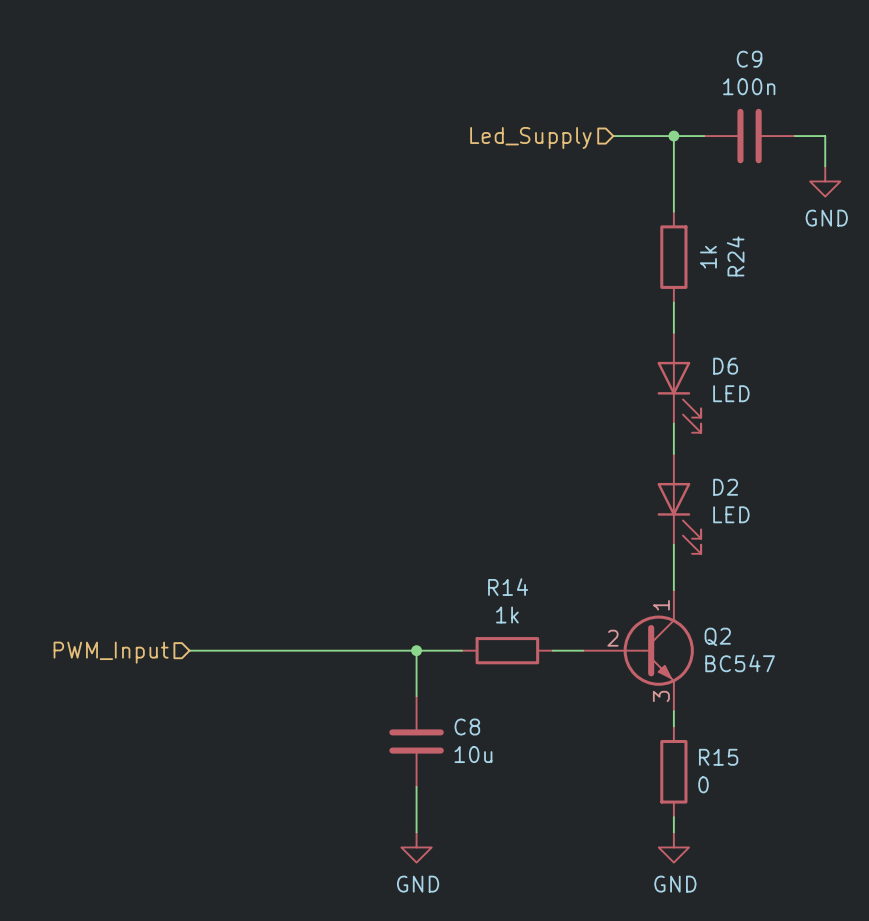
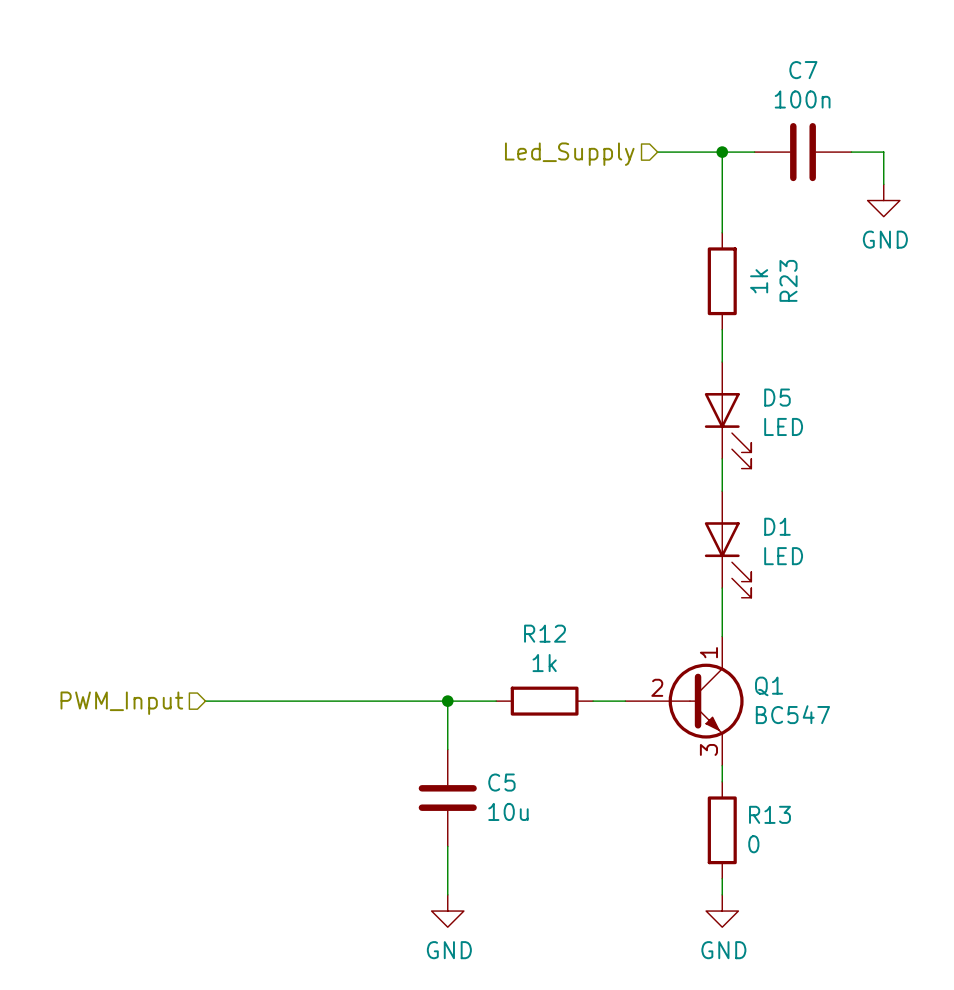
C9 name: C9 (749, 59) -> C7 (803, 70)
R24 name: R24 (735, 256) -> R23 (788, 280)
D6 name: D6 (725, 366) -> D5 (777, 397)
D2 name: D2 (725, 487) -> D1 (777, 526)
R14 name: R14 (508, 587) -> R12 (545, 633)
Q2 name: Q2 (717, 636) -> Q1 (769, 686)
C8 name: C8 (467, 727) -> C5 (501, 782)
R15 name: R15 (718, 757) -> R13 (769, 814)

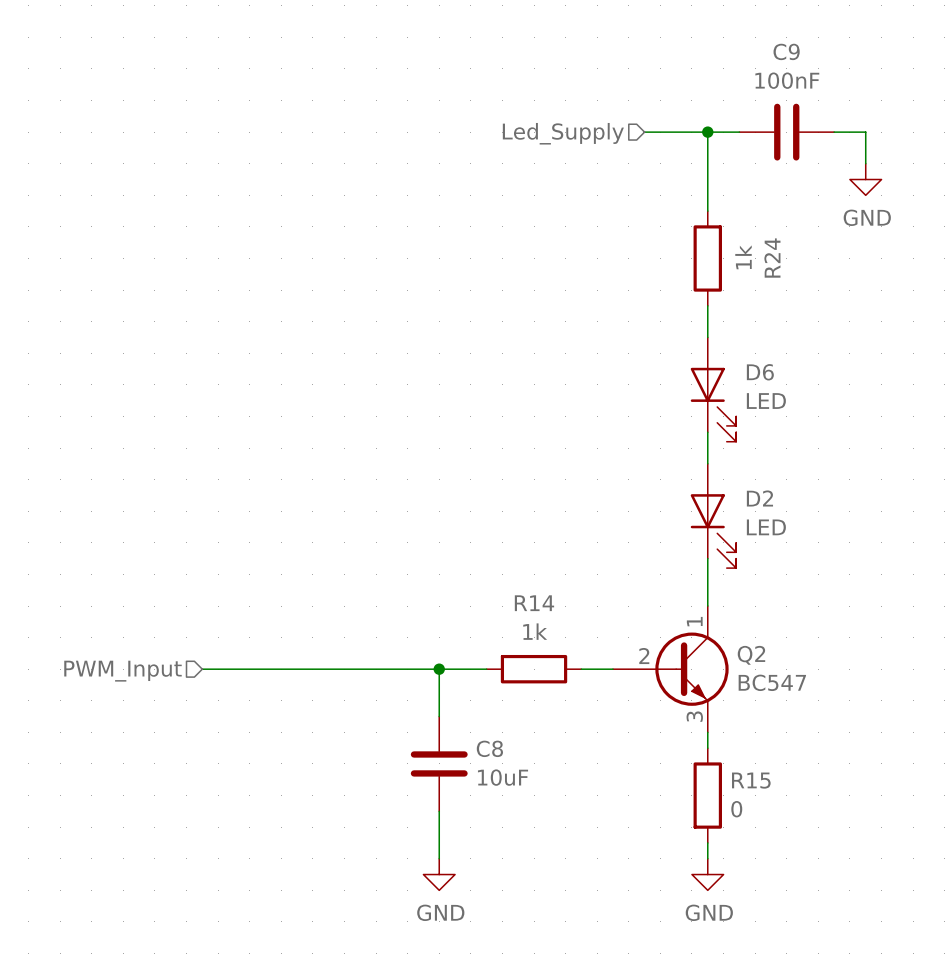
C7 name: C7 (803, 70) -> C9 (786, 51)
C7 value: 100n (802, 99) -> 100nF (787, 80)
R23 name: R23 (788, 280) -> R24 (772, 258)
D5 name: D5 (777, 397) -> D6 (760, 372)
D1 name: D1 (777, 526) -> D2 (759, 498)
R12 name: R12 (545, 633) -> R14 (534, 603)
Q1 name: Q1 (769, 686) -> Q2 (751, 655)
C5 name: C5 (501, 782) -> C8 (489, 748)
C5 value: 10u (508, 811) -> 10uF (503, 777)
R13 name: R13 (769, 814) -> R15 (751, 780)

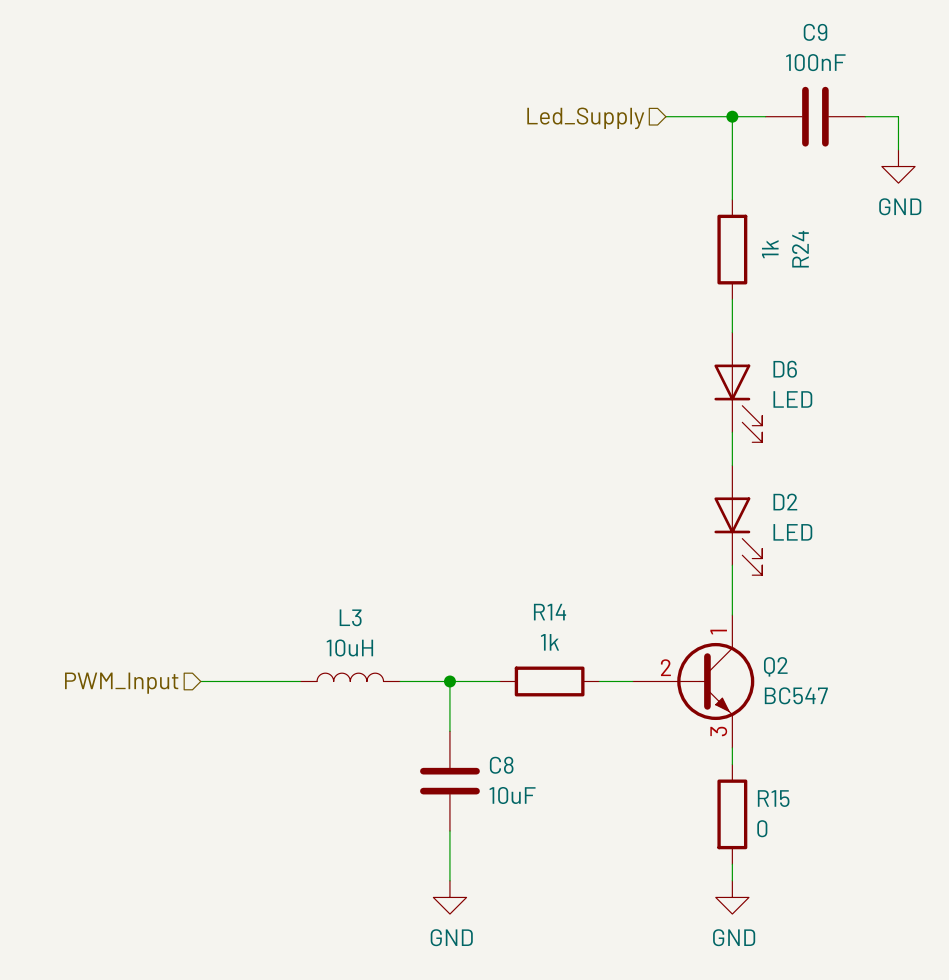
L3: none -> 10uH (350, 677)
wire: (297, 669) (391, 669) -> none

